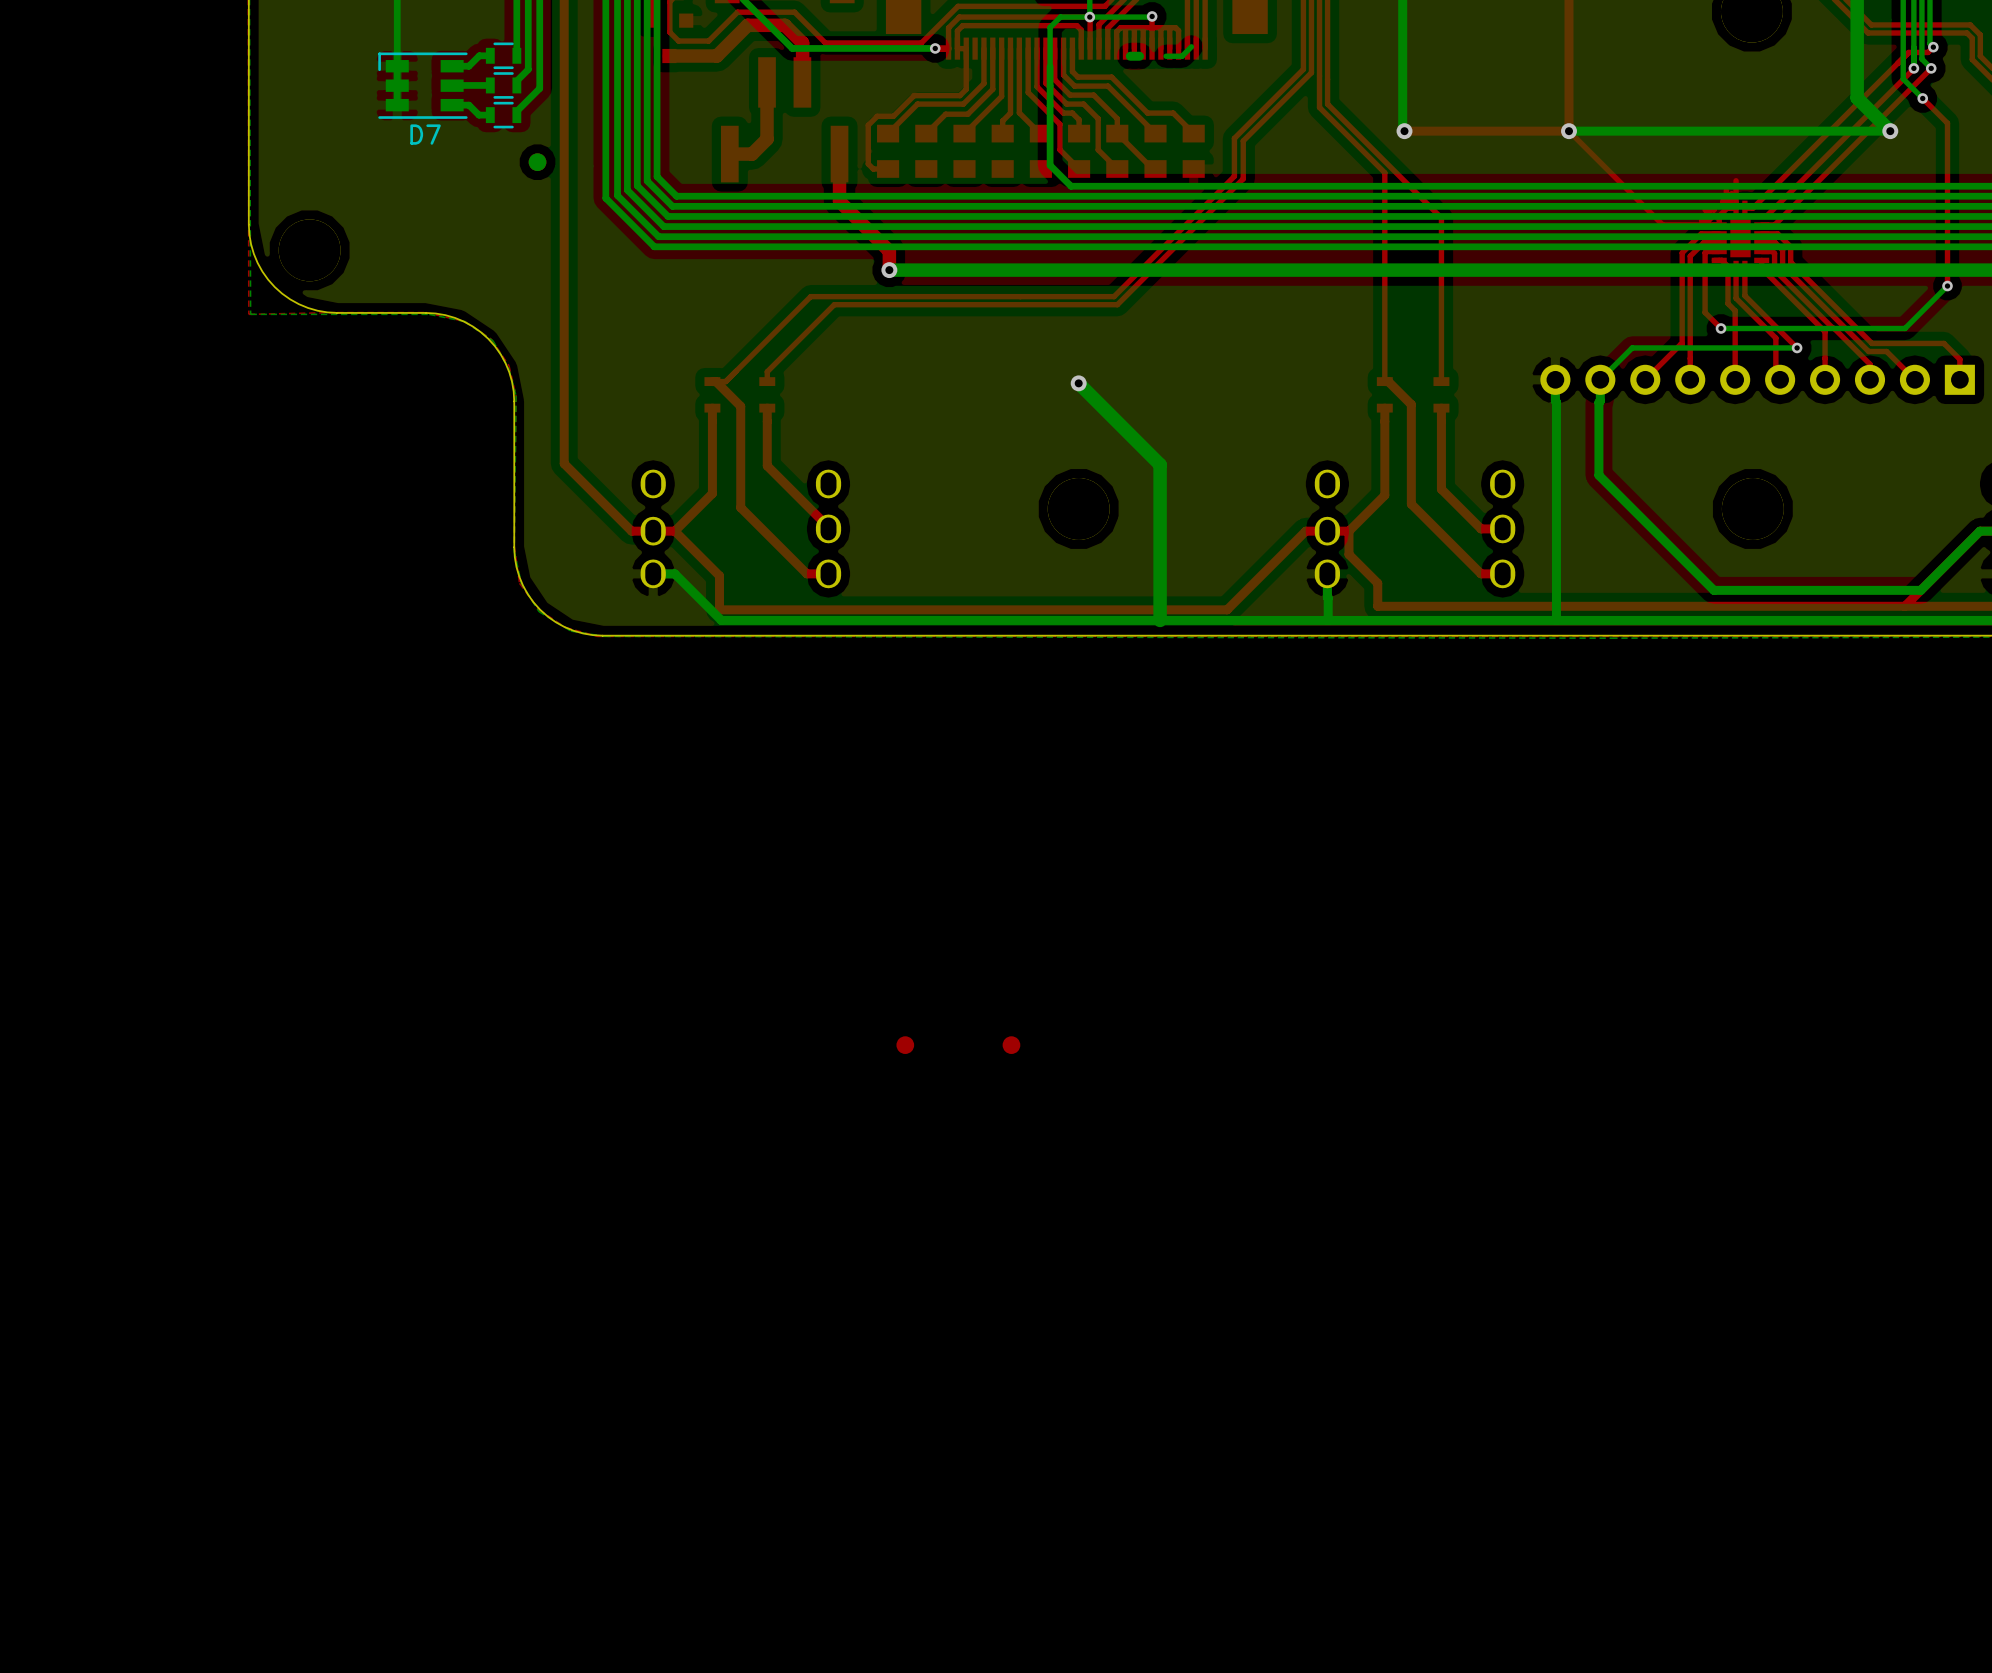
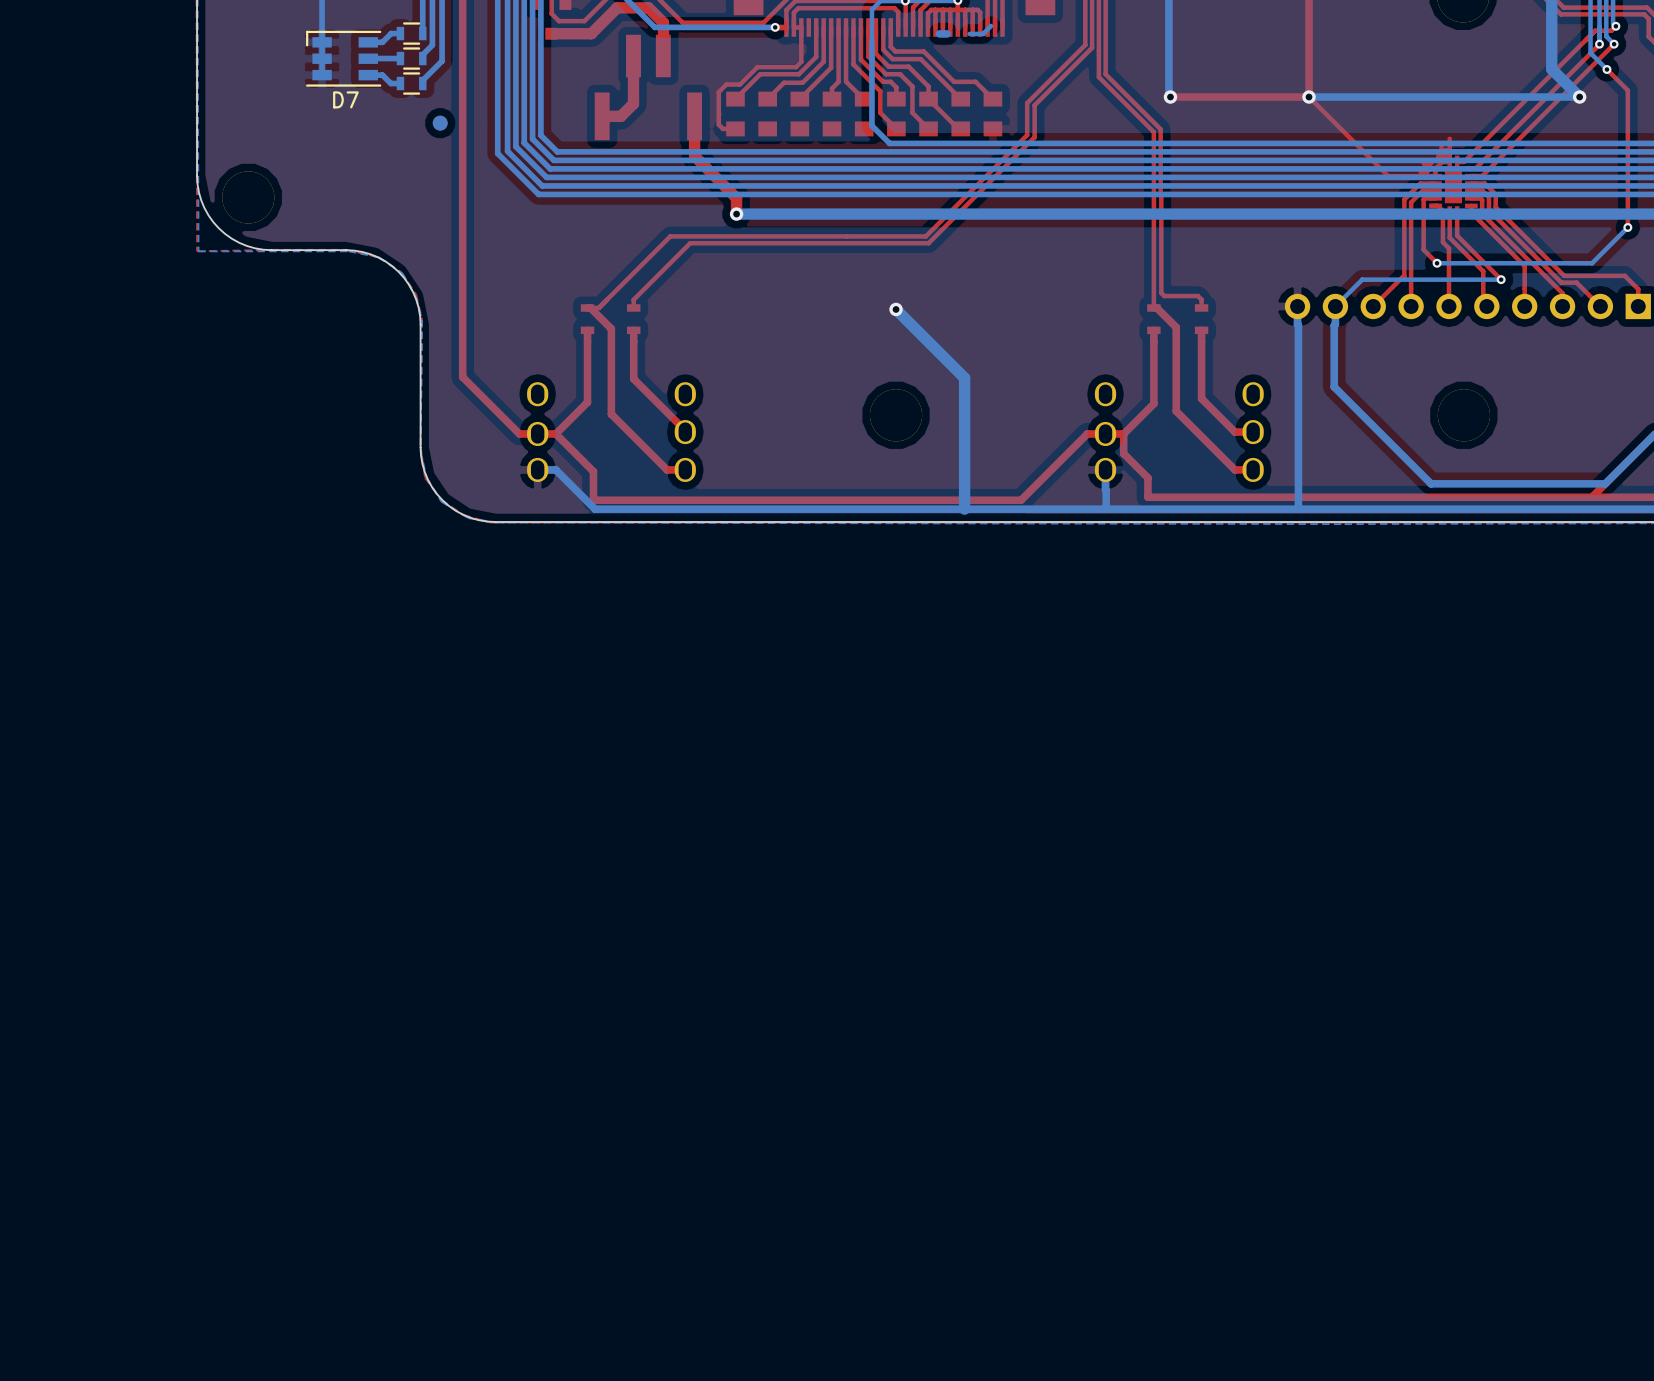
top track: (1392, 169) (1441, 218) (1441, 371) -> (1160, 129) (1161, 293) (1164, 296) (1197, 296) (1201, 299)
part: (905, 1045) -> none
part: (1011, 1045) -> none

